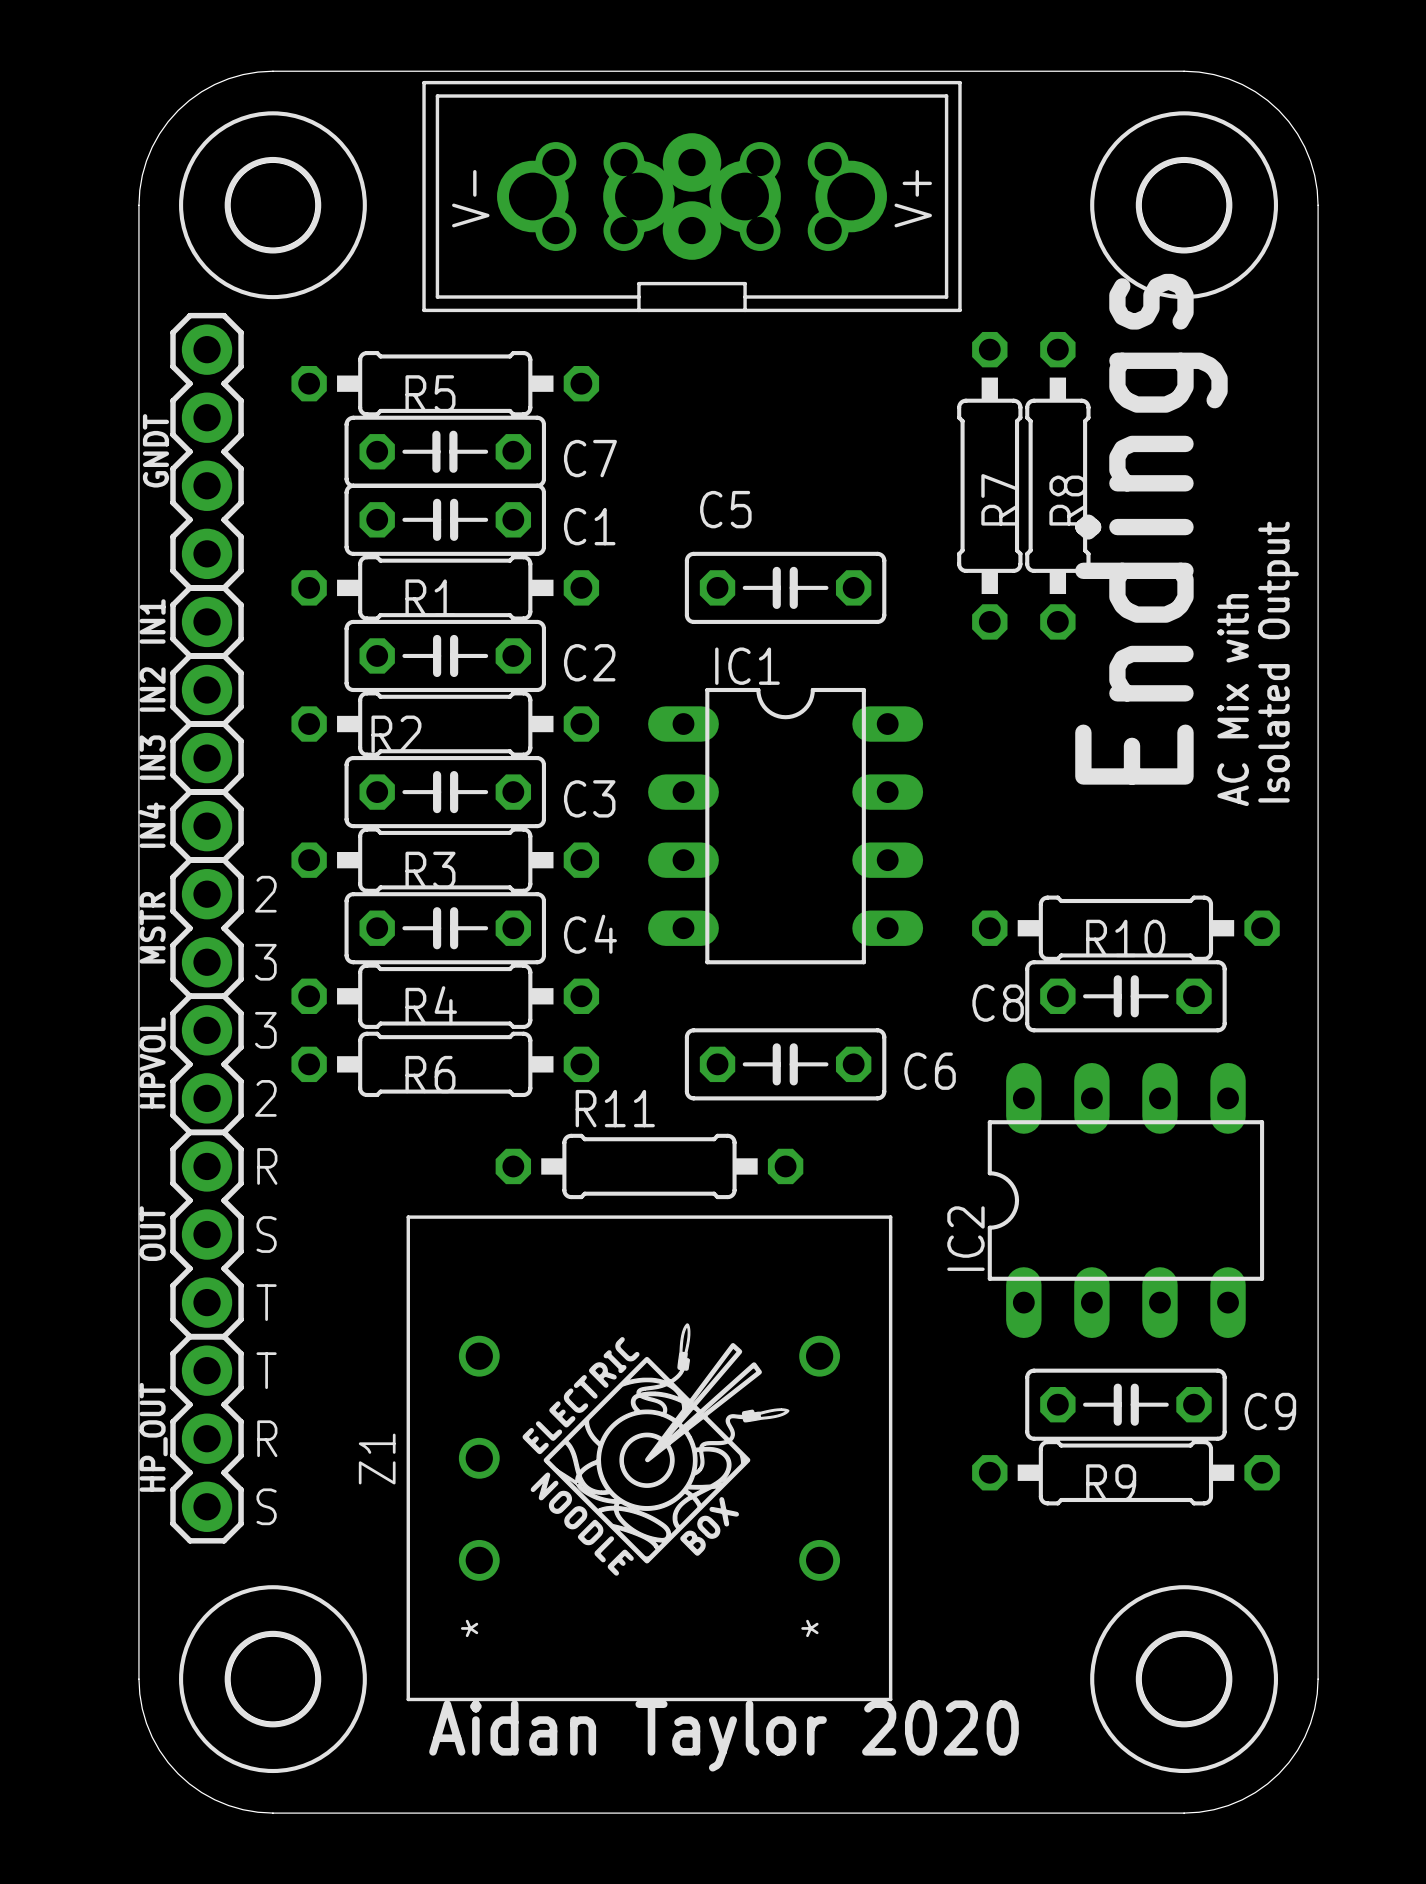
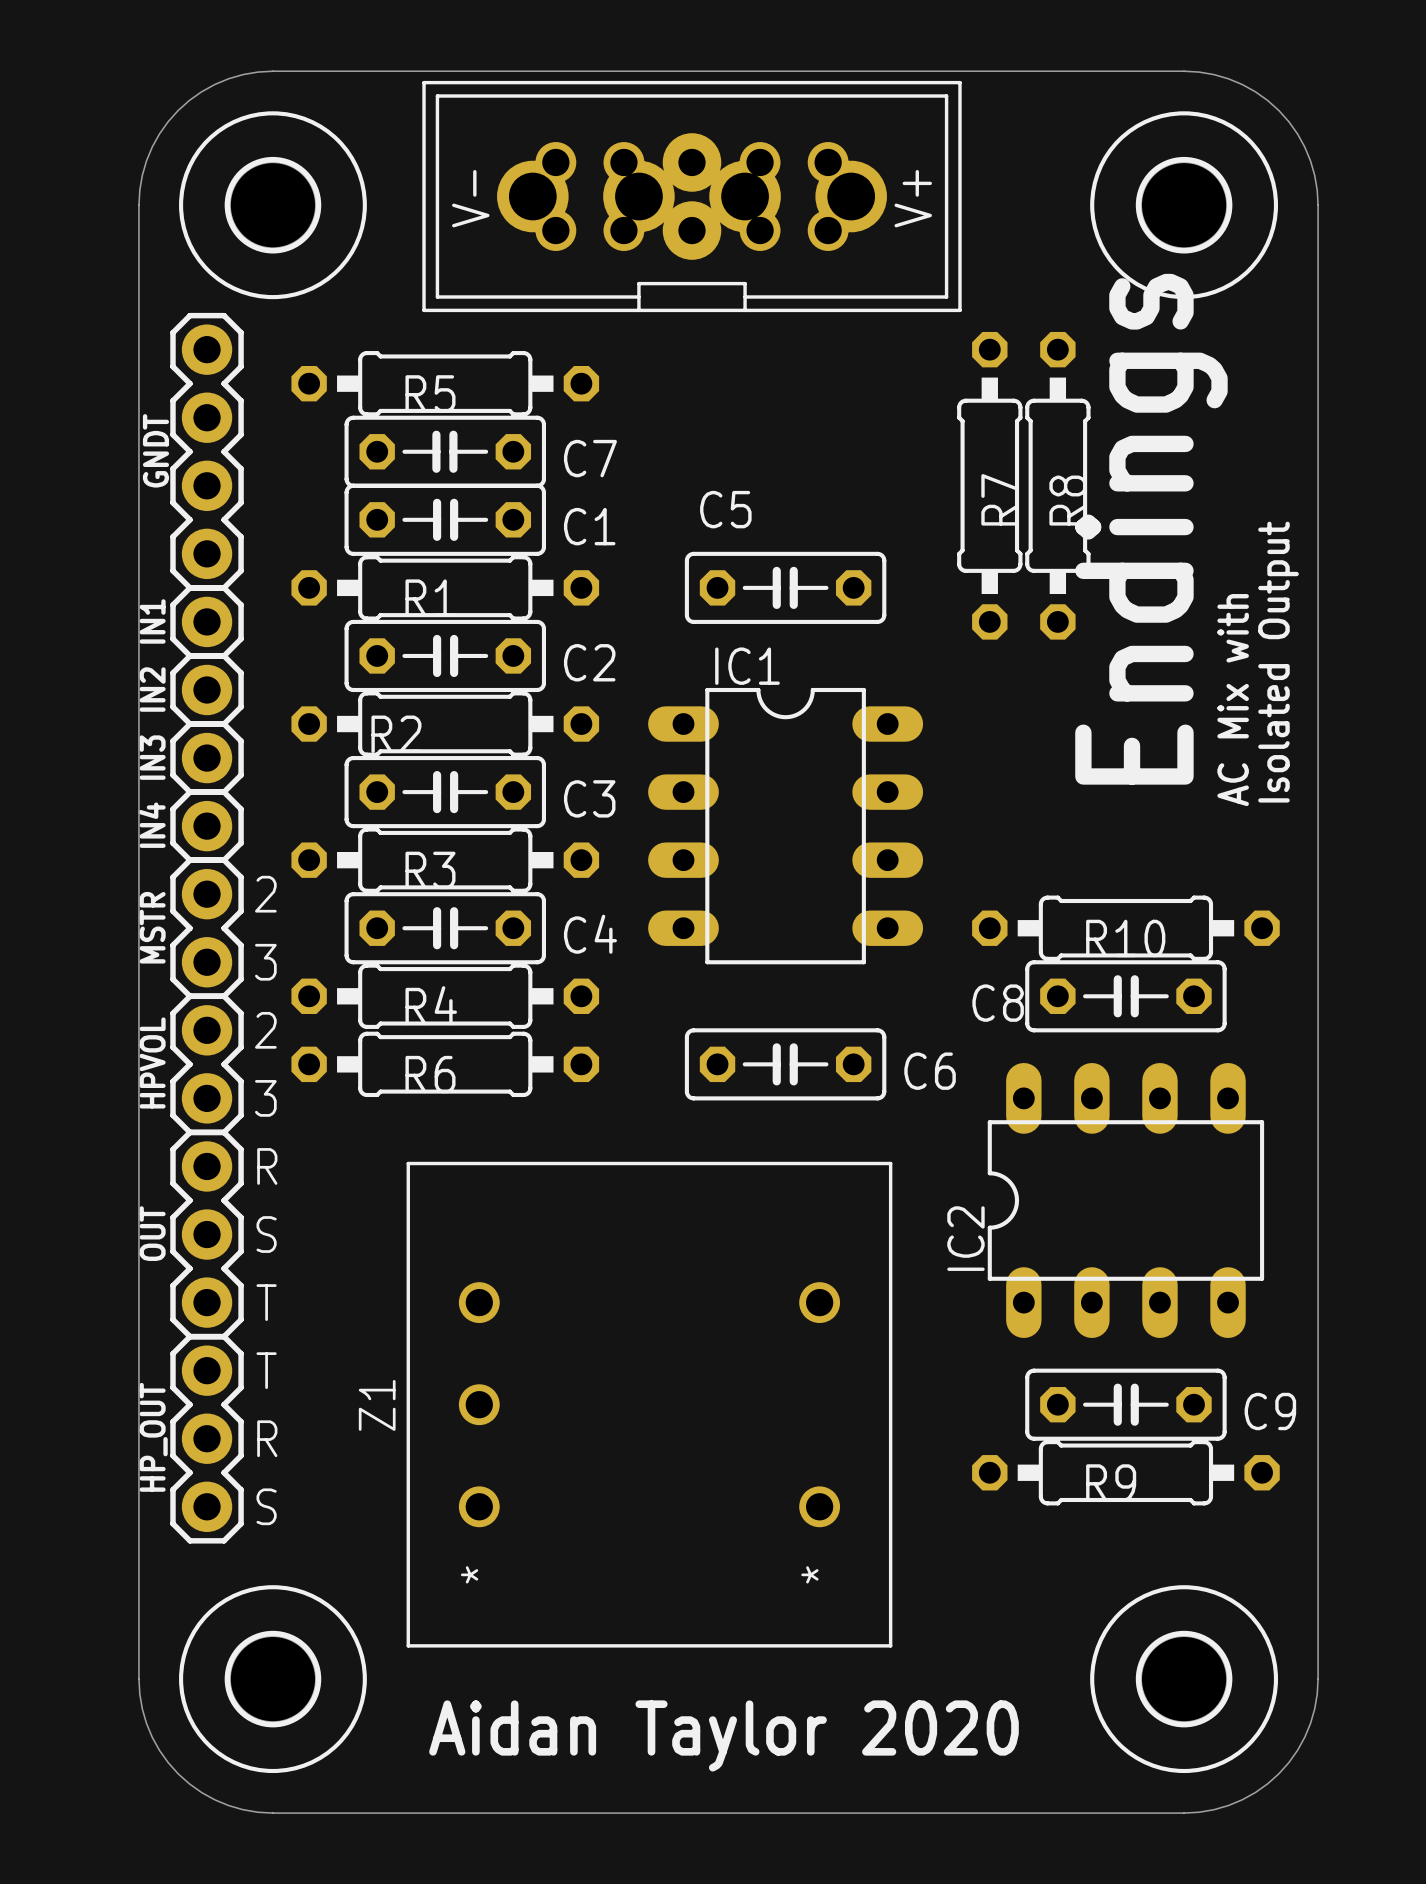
text: 3 (265, 1030) -> 2 (265, 1030)
text: 2 (265, 1098) -> 3 (265, 1098)
R11: (649, 1166) -> none
drawing: [522, 1323, 790, 1576] -> none
Z1 position: (649, 1458) -> (649, 1404)

